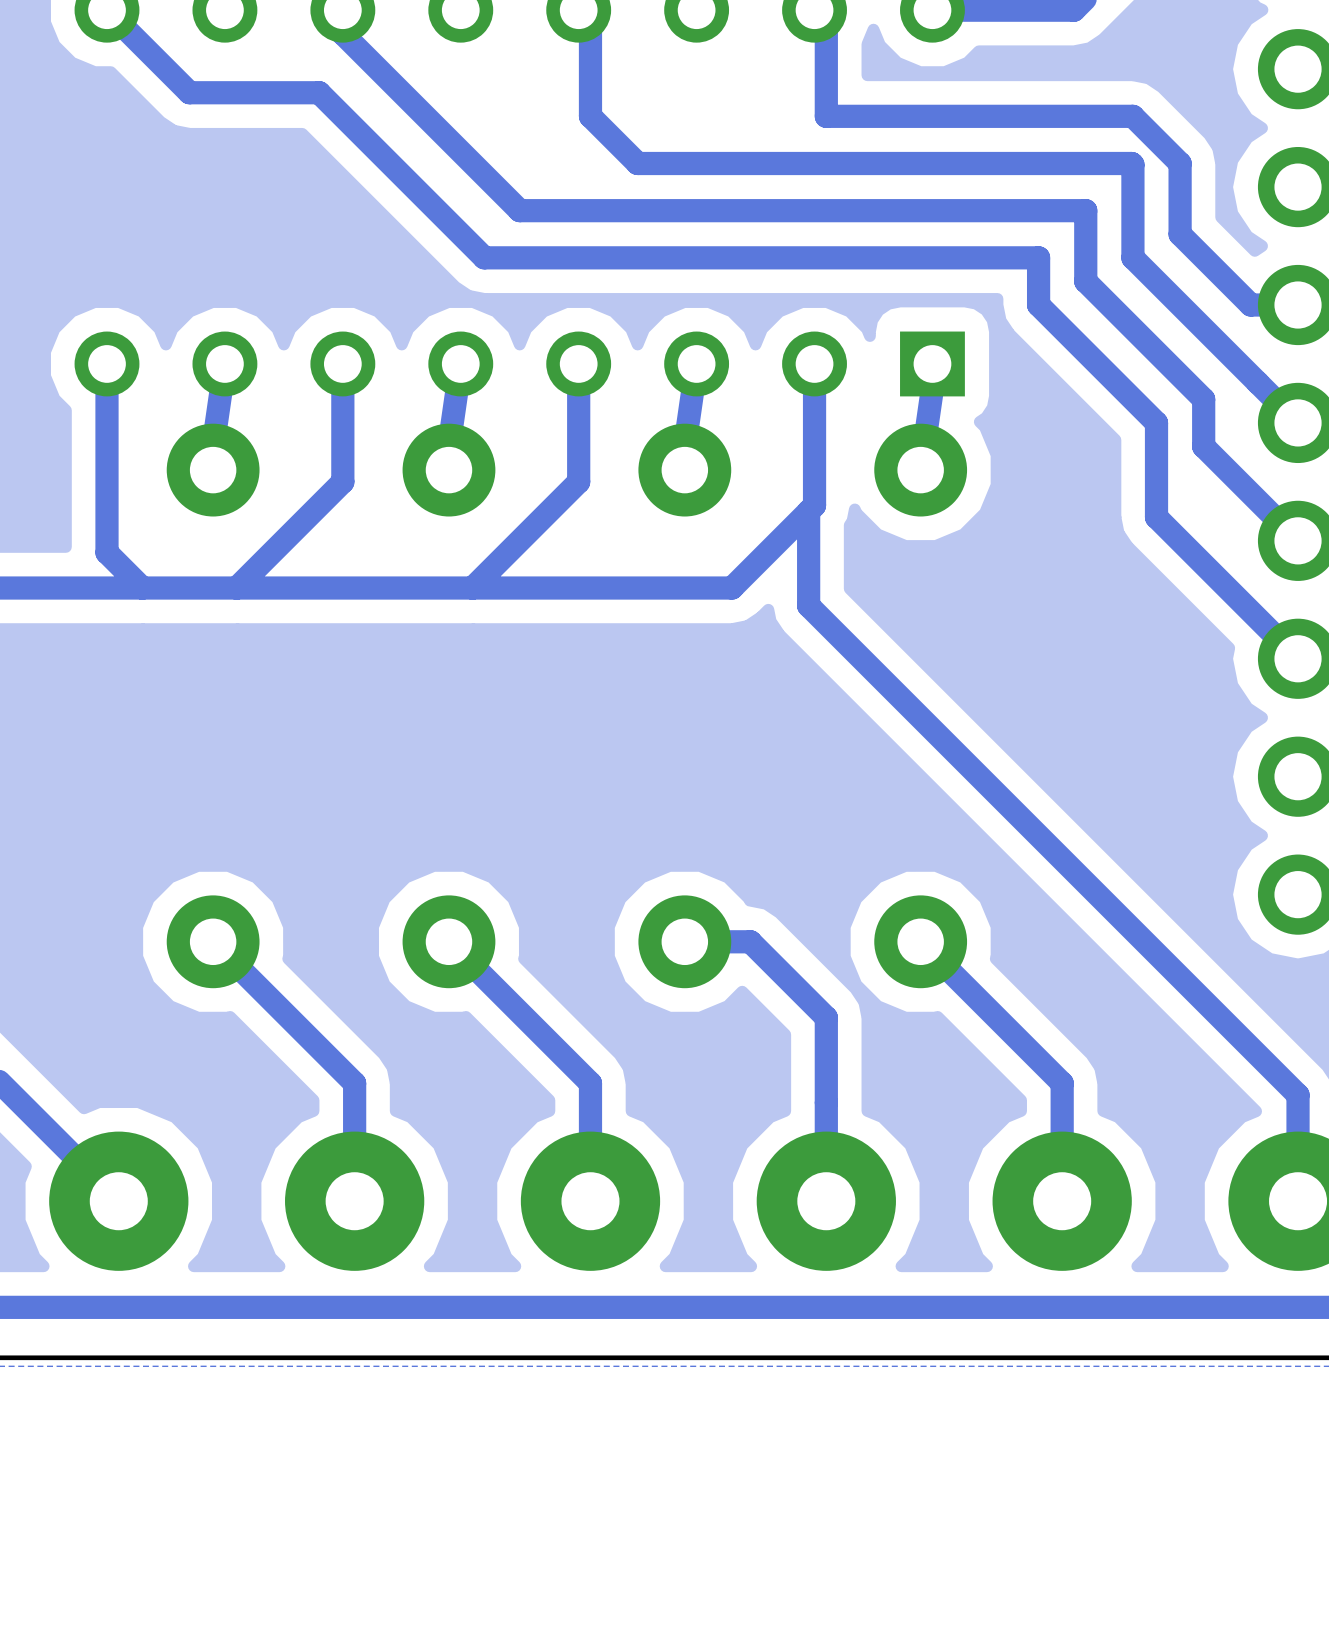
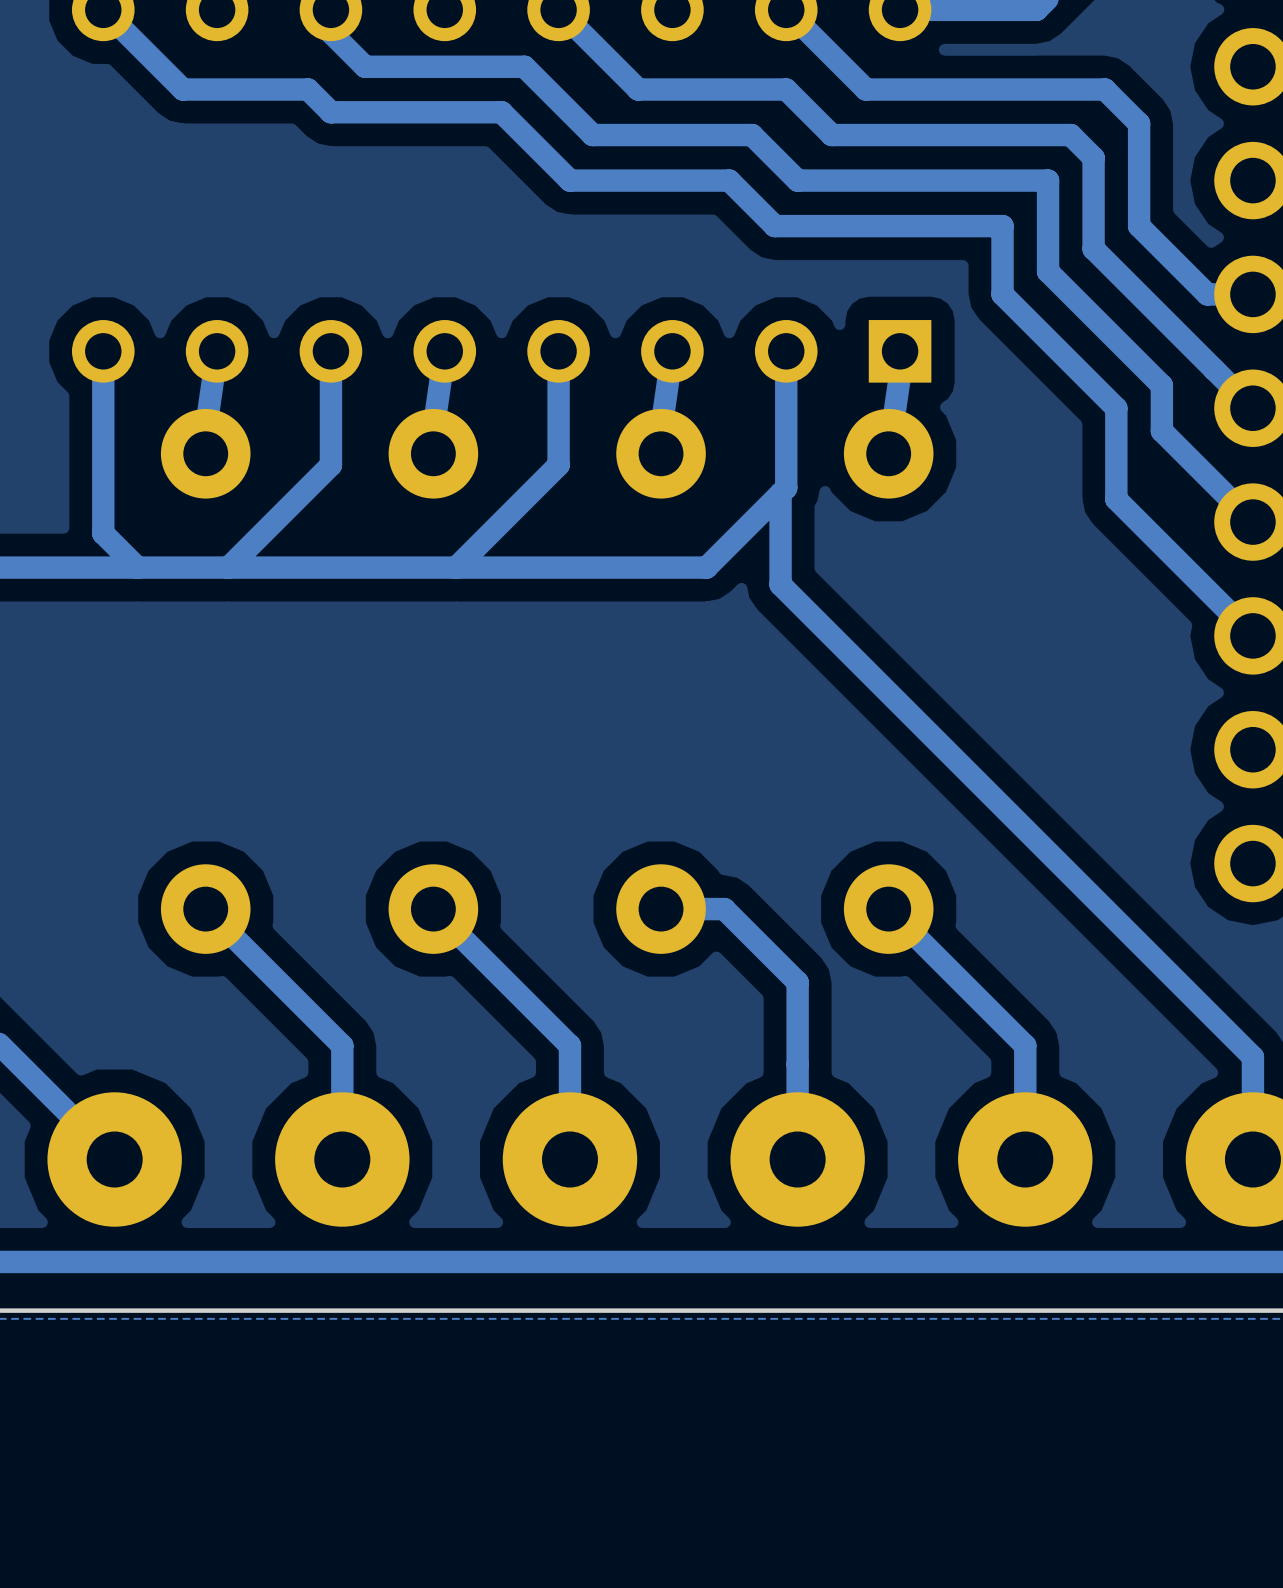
bottom track: (590, 21) (590, 116) -> (365, 66) (524, 66) (569, 112)
bottom track: none -> (569, 21) (638, 89) (786, 89) (831, 135) (1070, 135) (1093, 158)
bottom track: (826, 21) (826, 116) (1132, 116) (1180, 163) -> (797, 21) (865, 89) (1104, 89) (1139, 123) (1139, 157)
bottom track: (378, 69) (519, 210) (1085, 210) -> none
bottom track: (342, 116) (484, 257) (1038, 257) -> (330, 112) (501, 112) (569, 180) (729, 180) (774, 226) (1002, 226) (1002, 248)
bottom track: (614, 139) (637, 163) (1132, 164) -> (592, 135) (752, 135) (797, 180) (1048, 180) (1048, 203)

